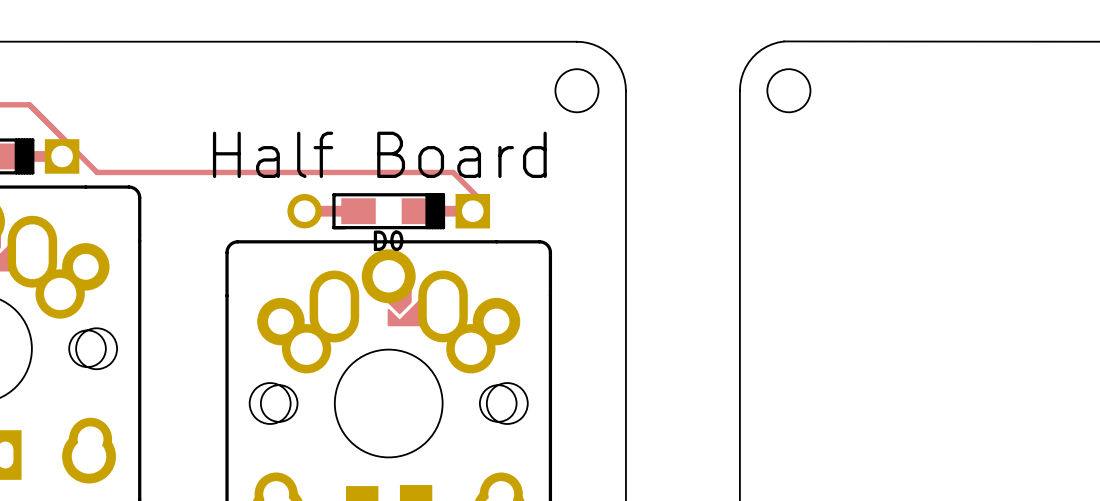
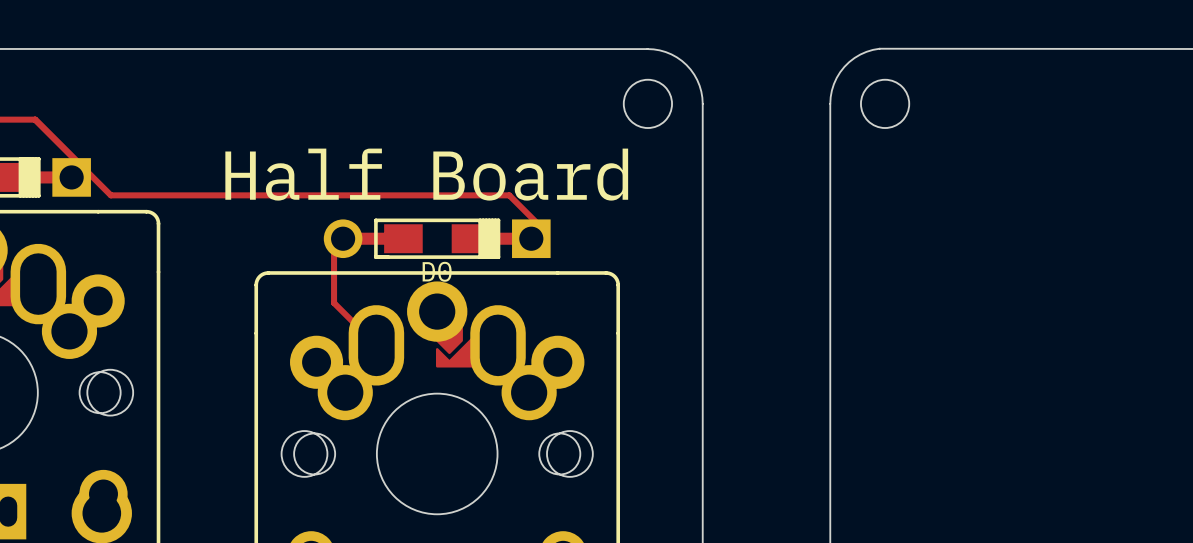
track: none -> (334, 238) (334, 303) (376, 345)

